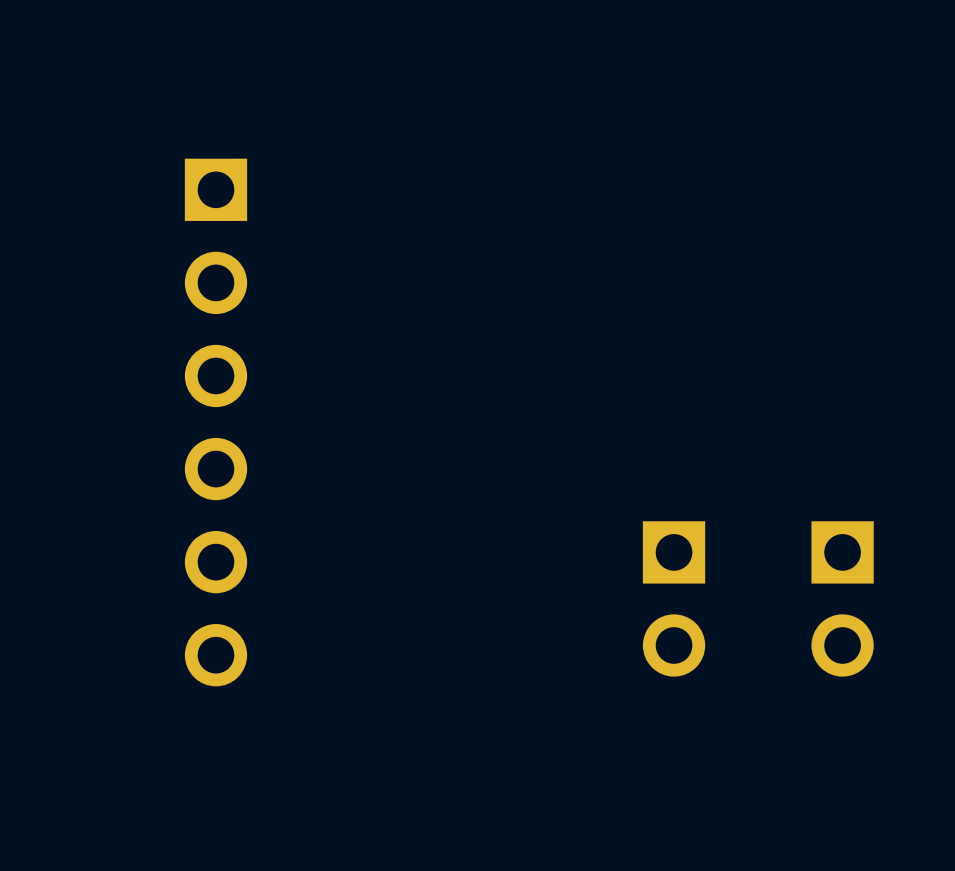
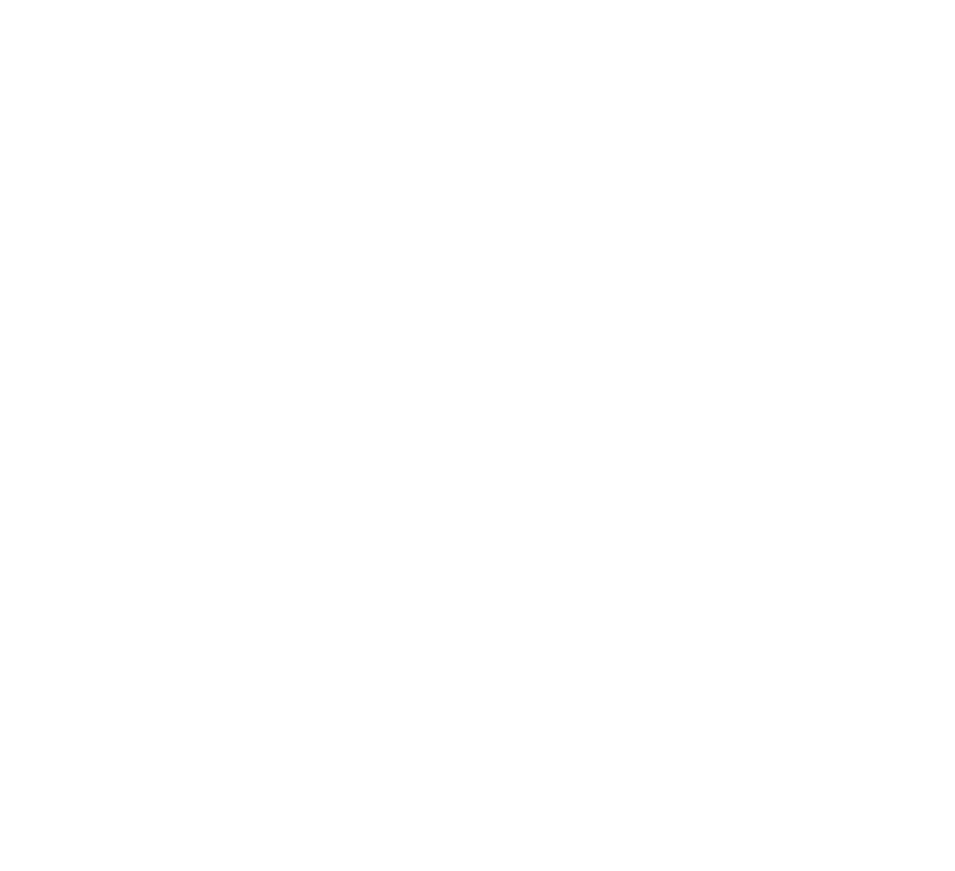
part: (216, 422) -> none
part: (674, 598) -> none
part: (842, 598) -> none

